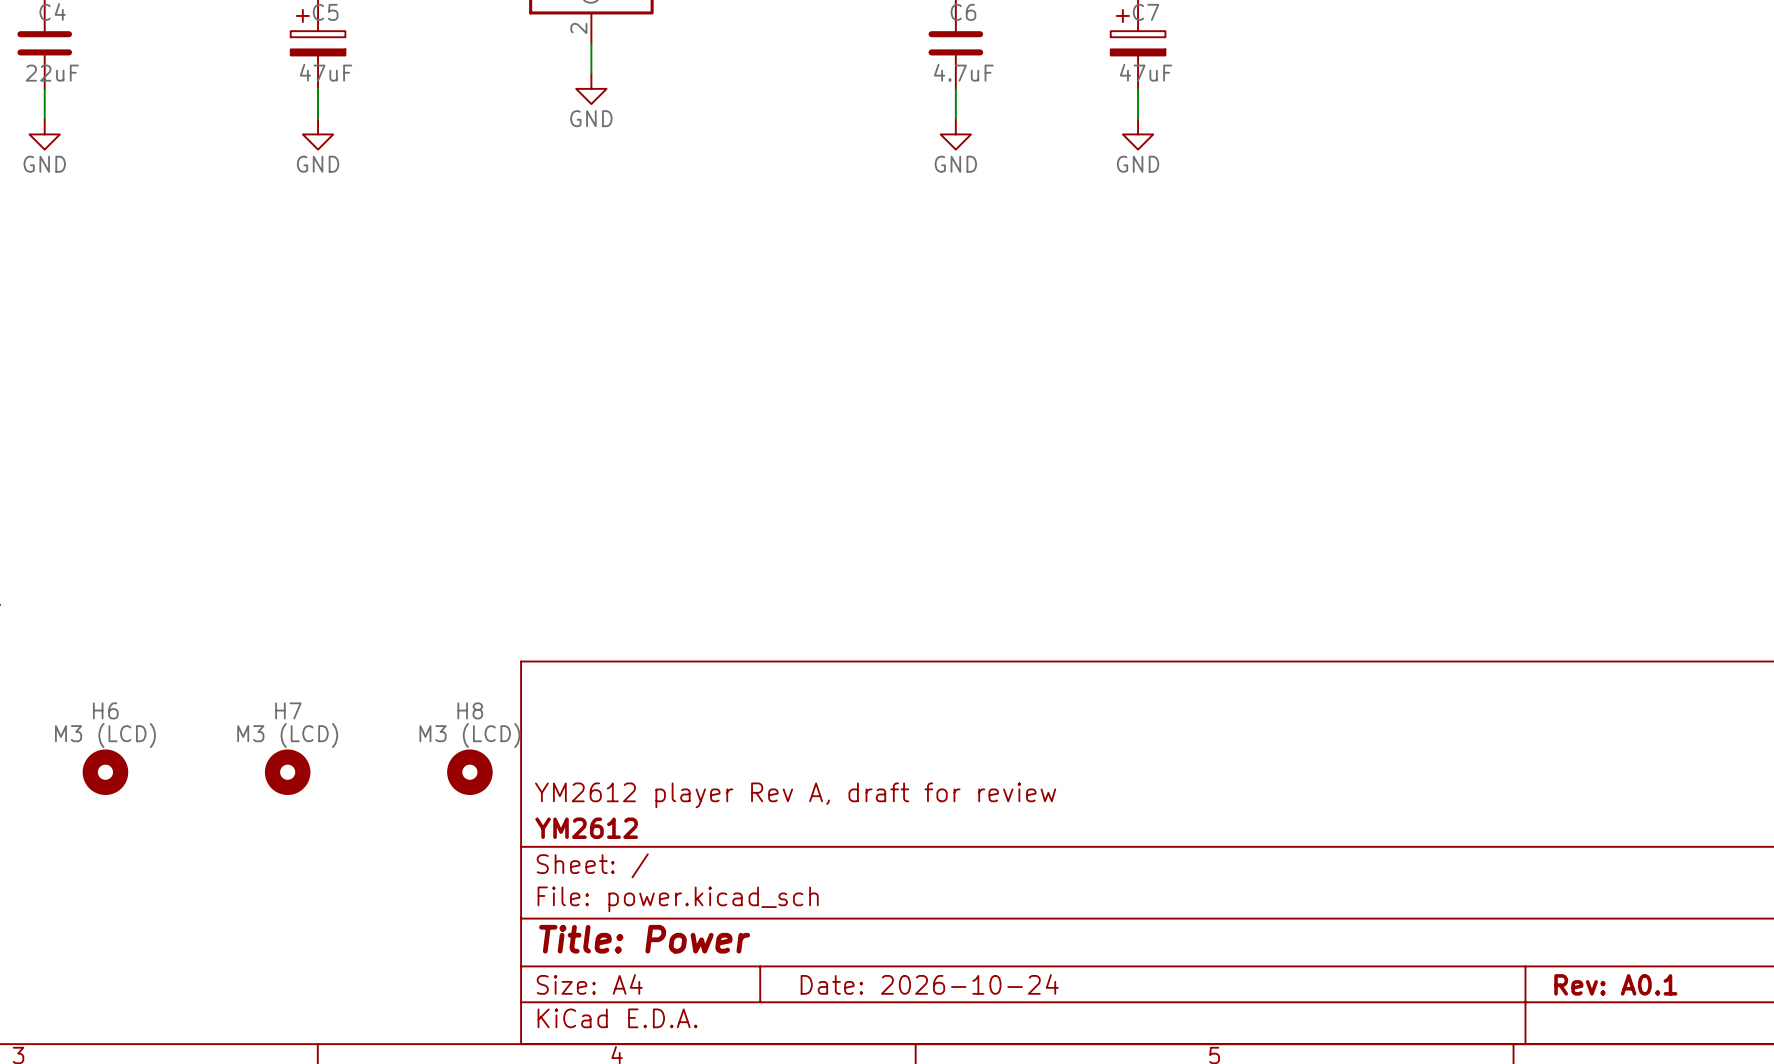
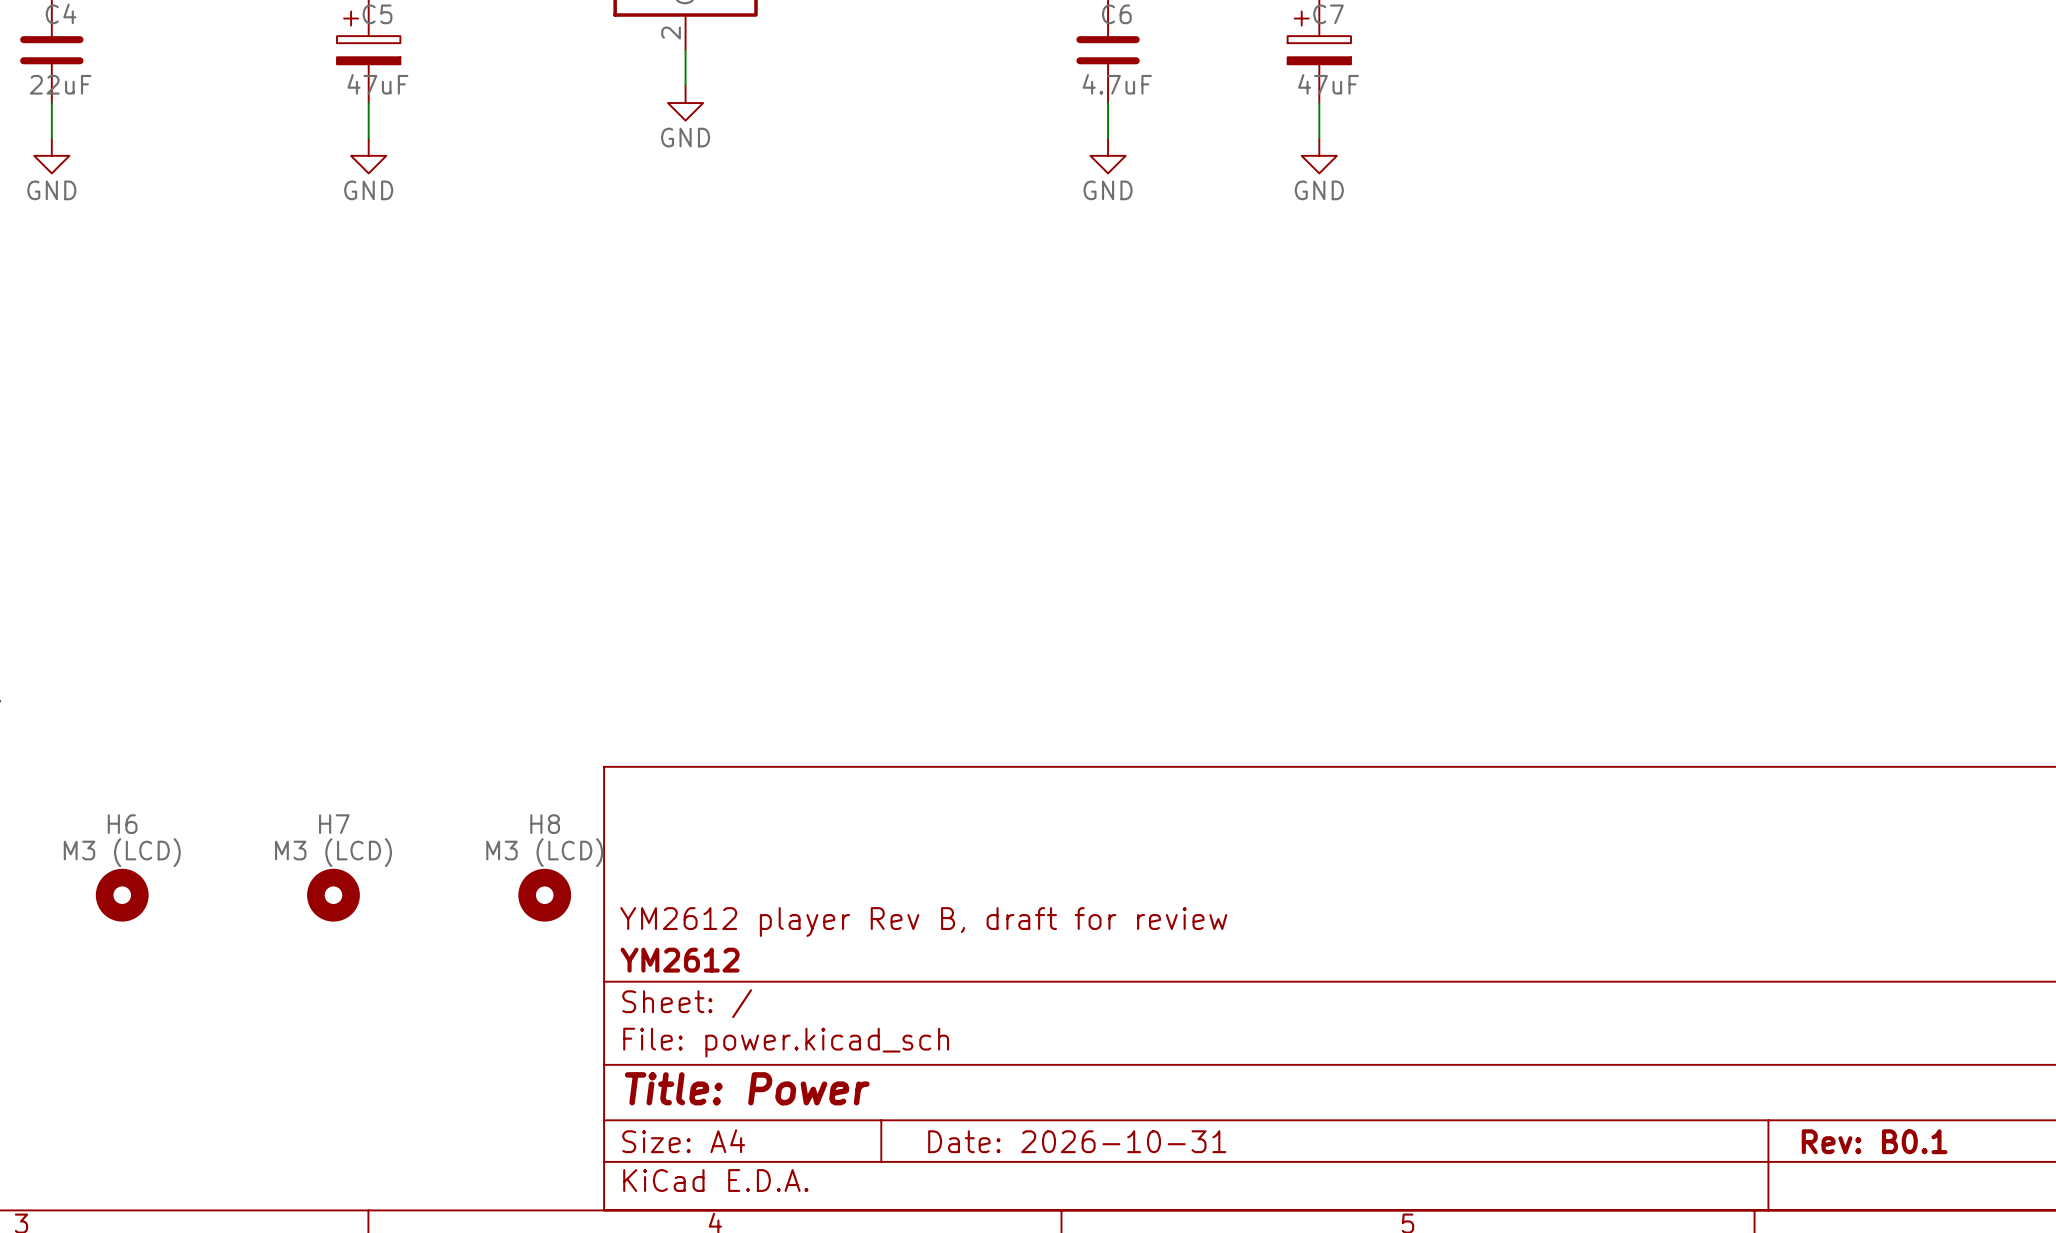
title block: YM2612 player Rev A, draft for review (795, 795) -> YM2612 player Rev B, draft for review (923, 922)
title block: Date: 2026-10-24 (929, 984) -> Date: 2026-10-31 (1077, 1141)
title block: Rev: A0.1 (1615, 984) -> Rev: B0.1 (1874, 1141)

